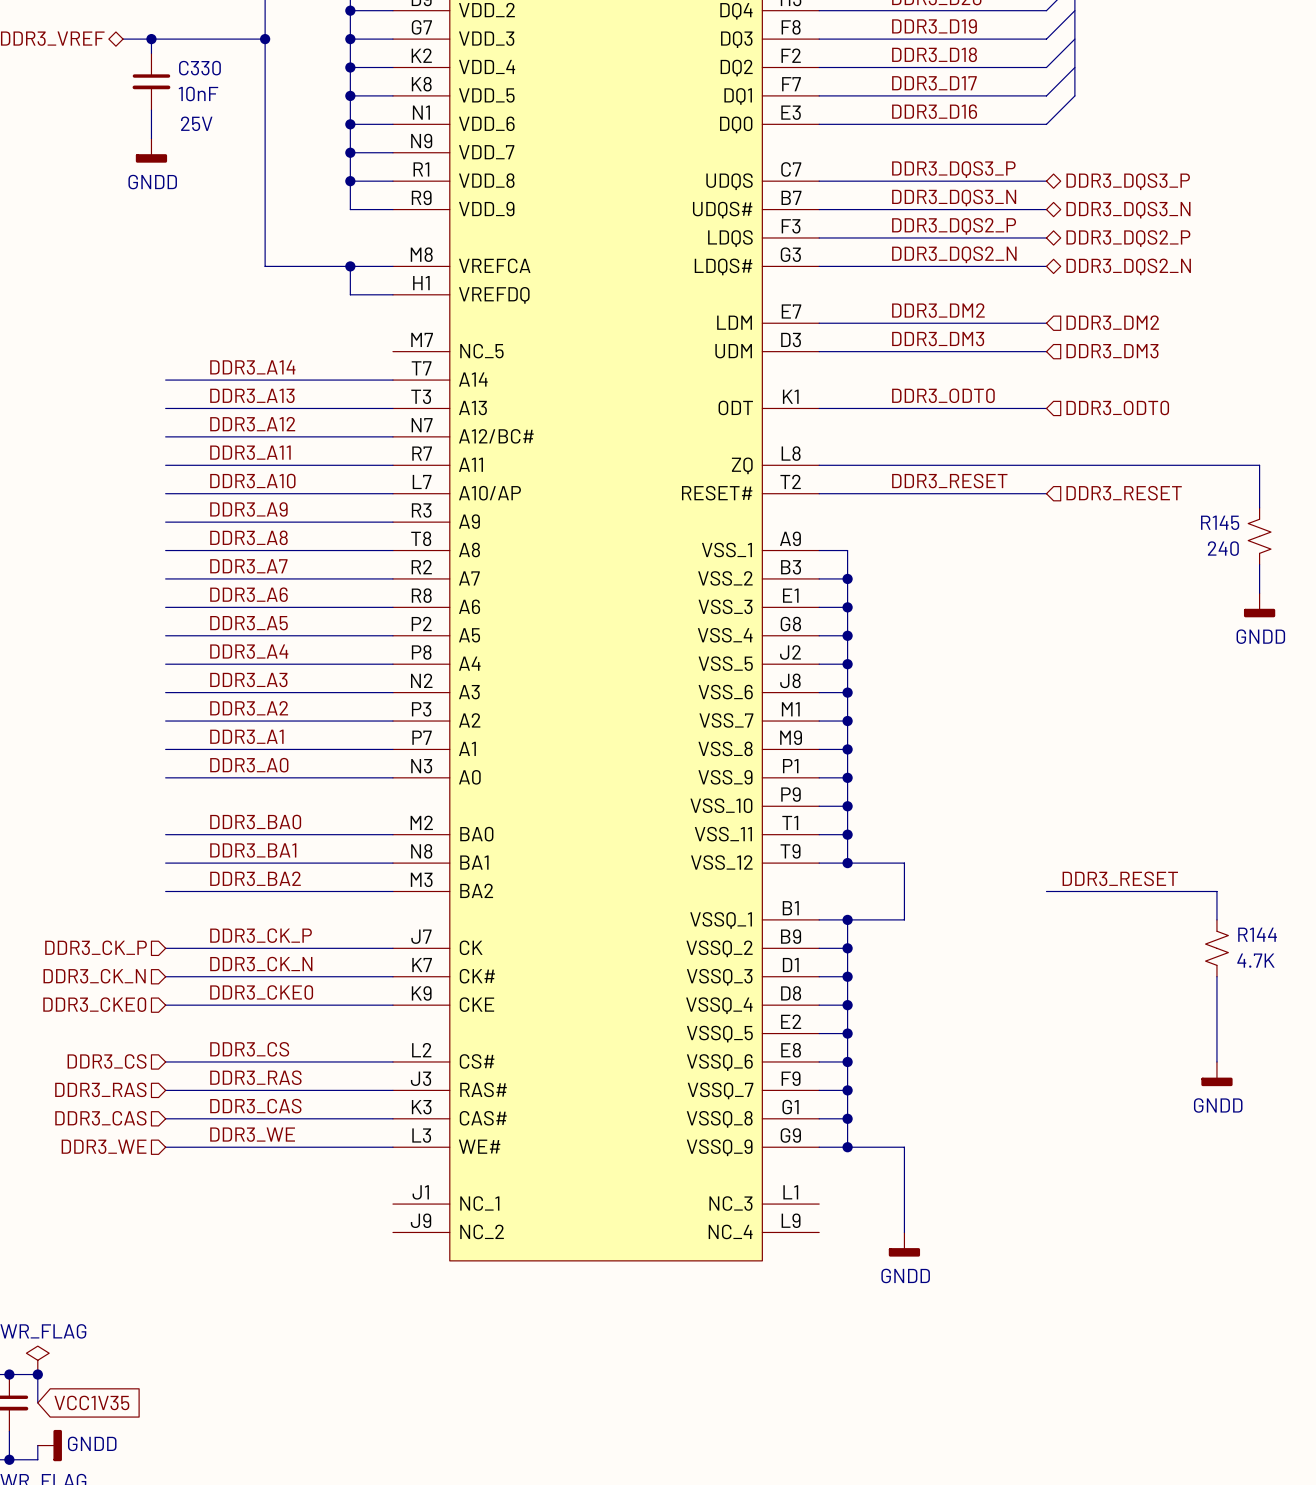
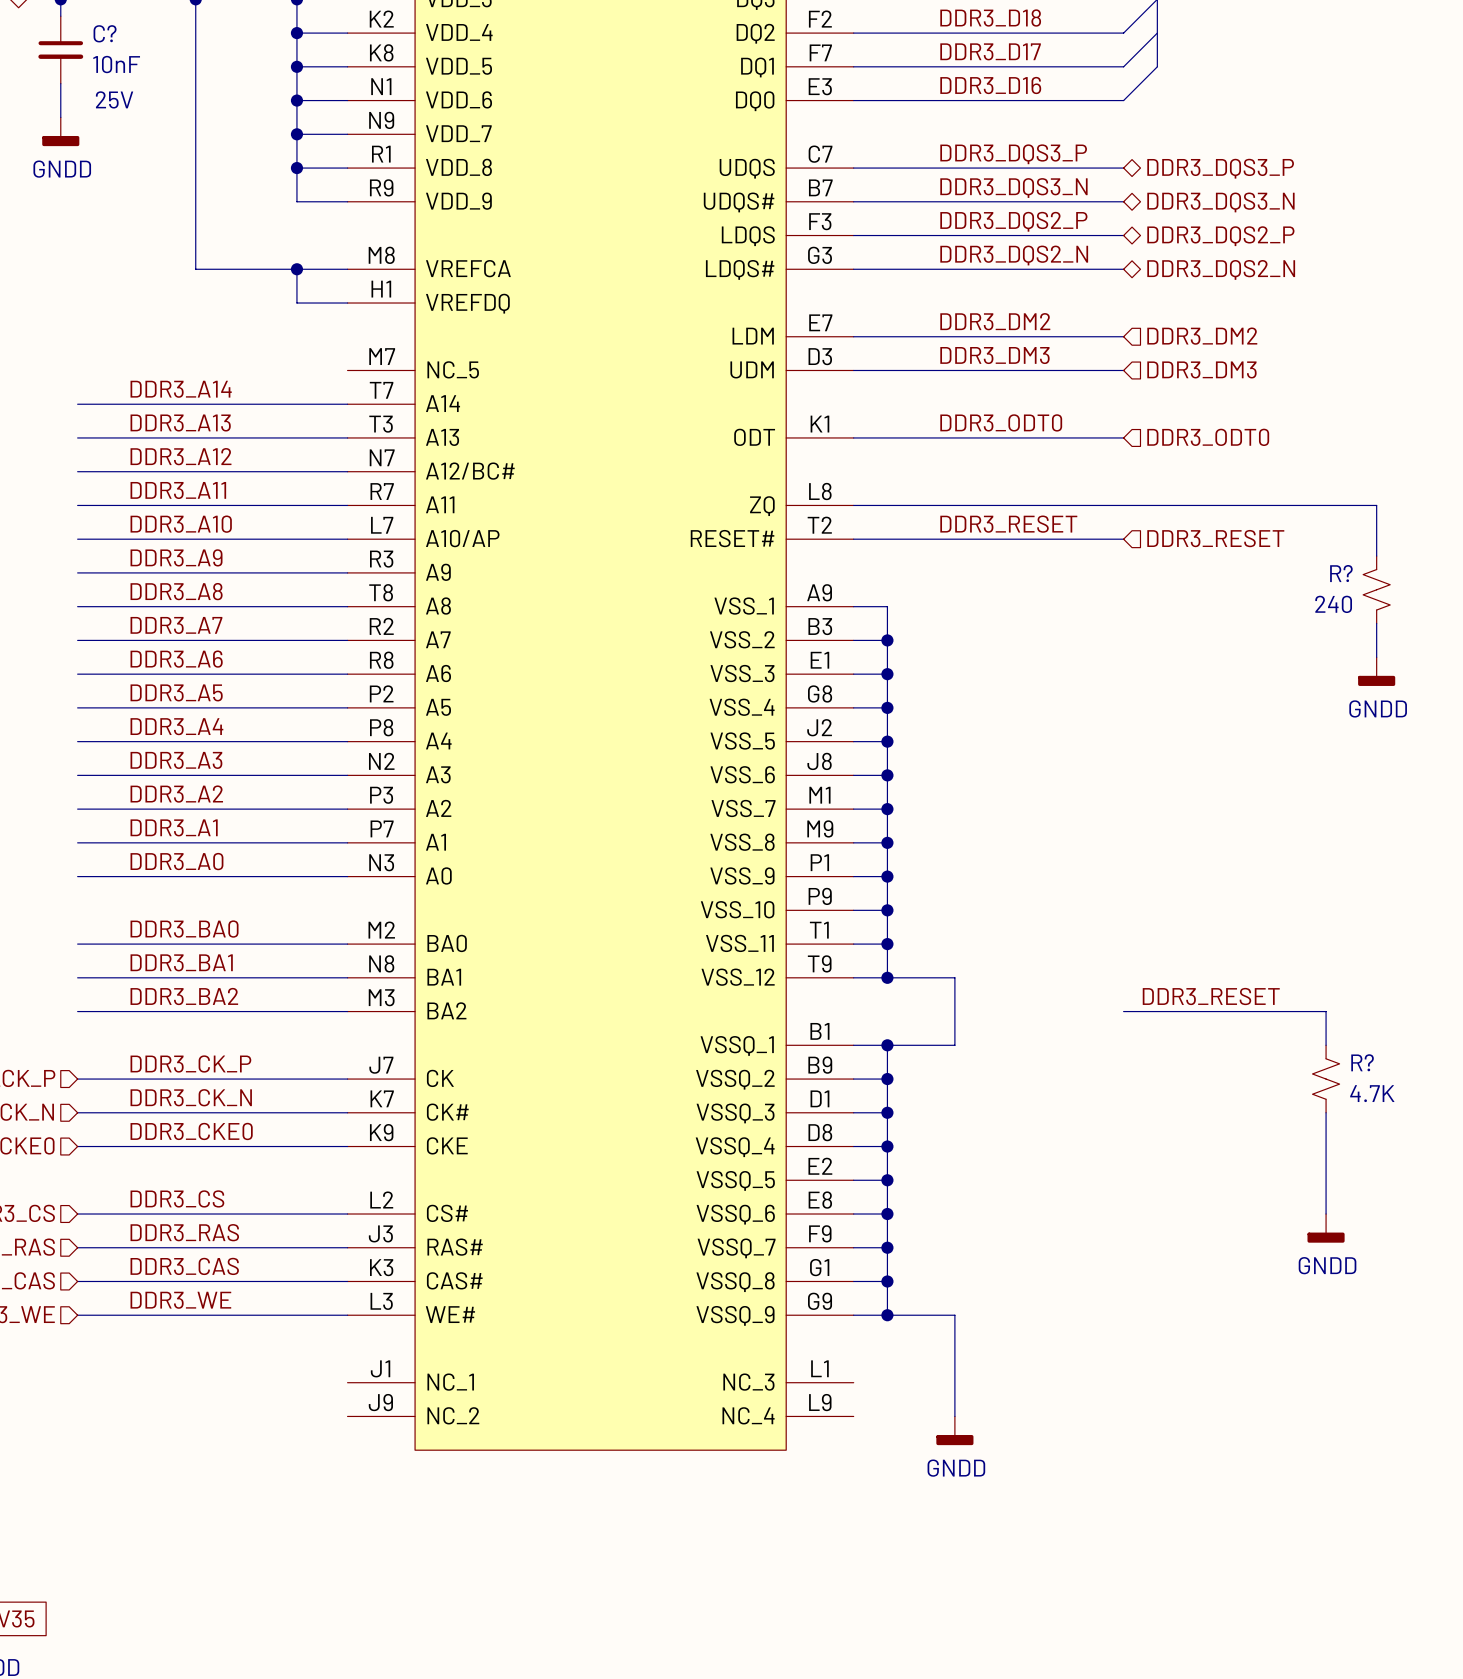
C330 name: C330 (199, 68) -> C? (105, 33)
R145 name: R145 (1220, 522) -> R? (1341, 573)
R144 name: R144 (1257, 934) -> R? (1362, 1062)

